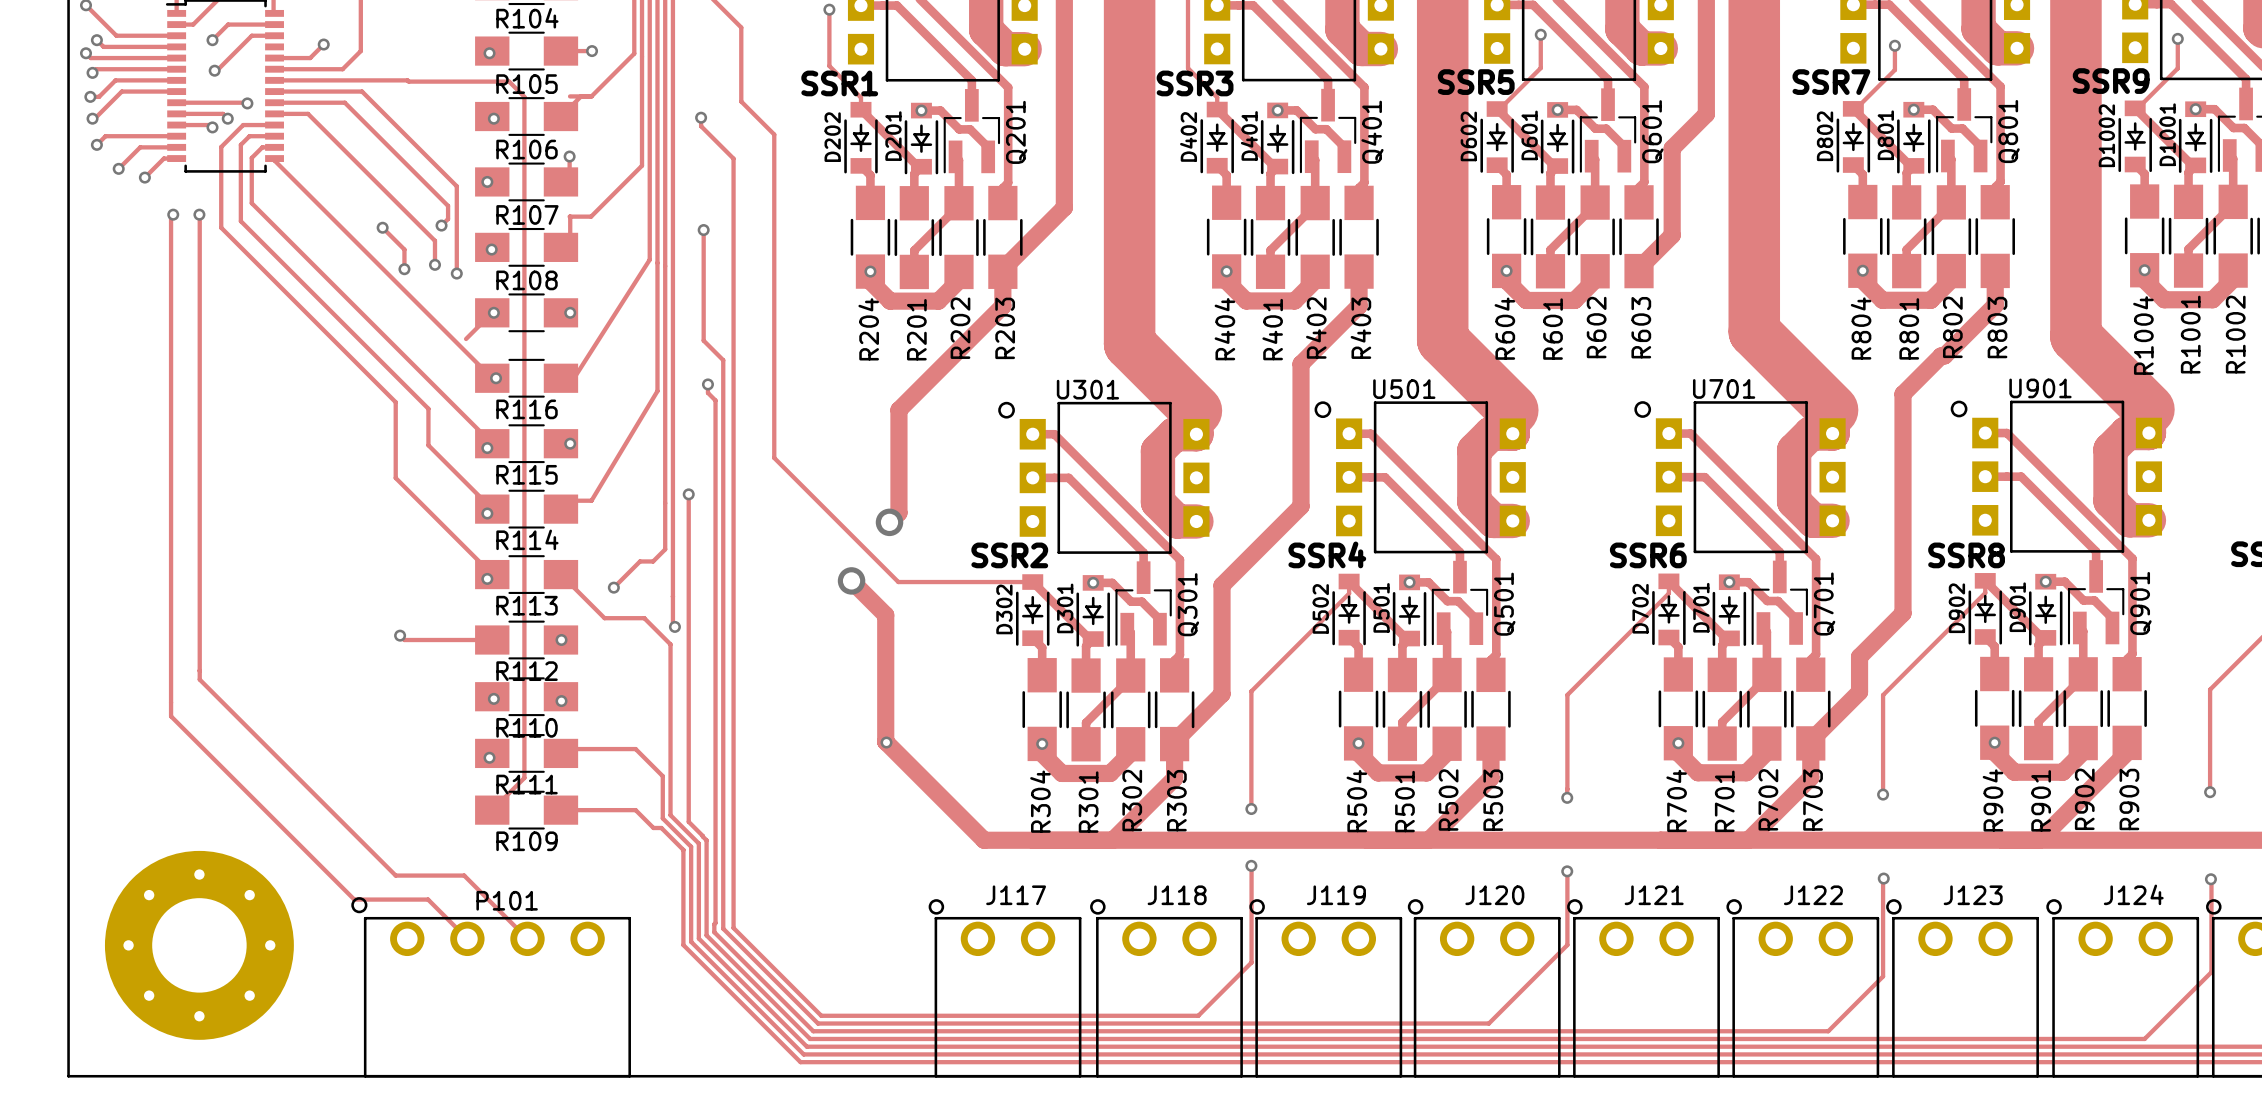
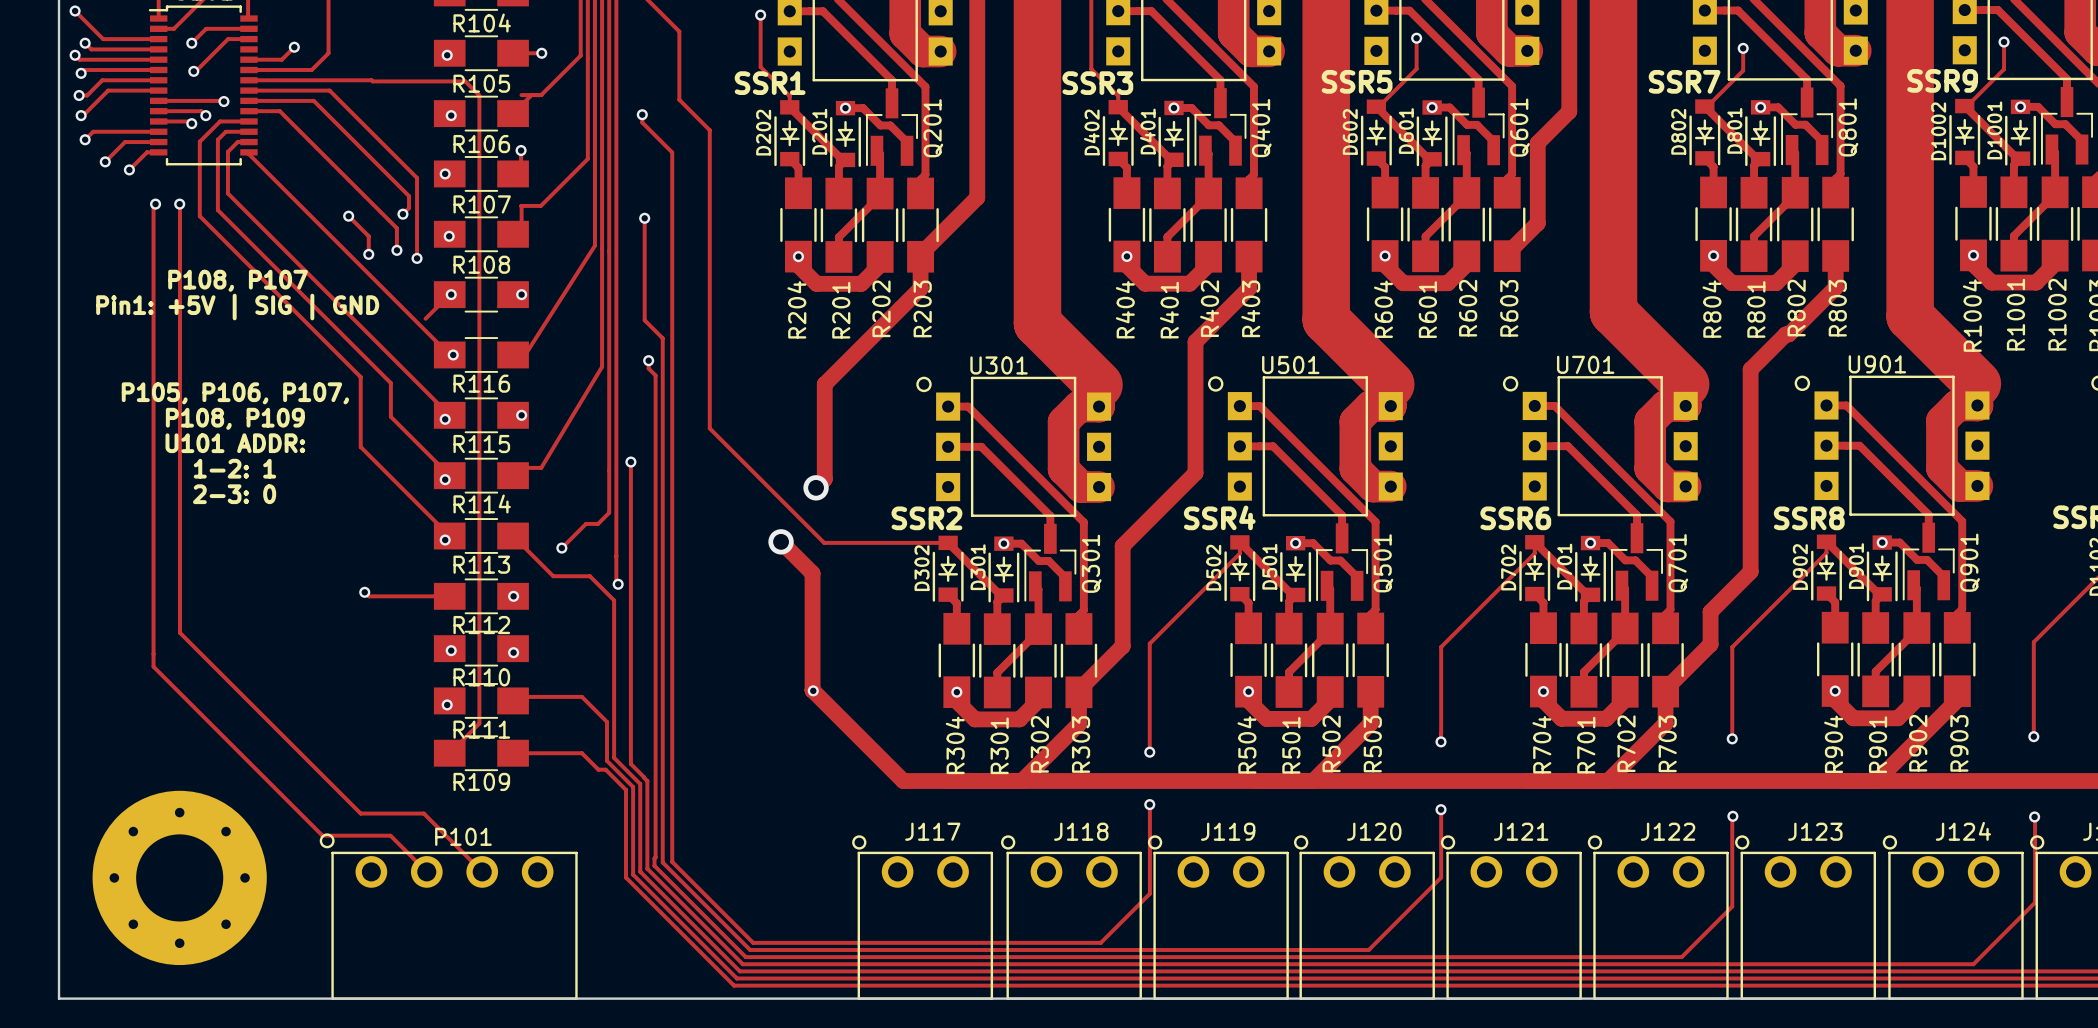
text: none -> P108, P107 (238, 280)
text: none -> Pin1: +5V | SIG | GND (237, 307)
text: none -> P105, P106, P107, (235, 393)
text: none -> P108, P109 (235, 418)
text: none -> U101 ADDR: (235, 443)
text: none -> 1-2: 1 (234, 468)
text: none -> 2-3: 0 (234, 494)

